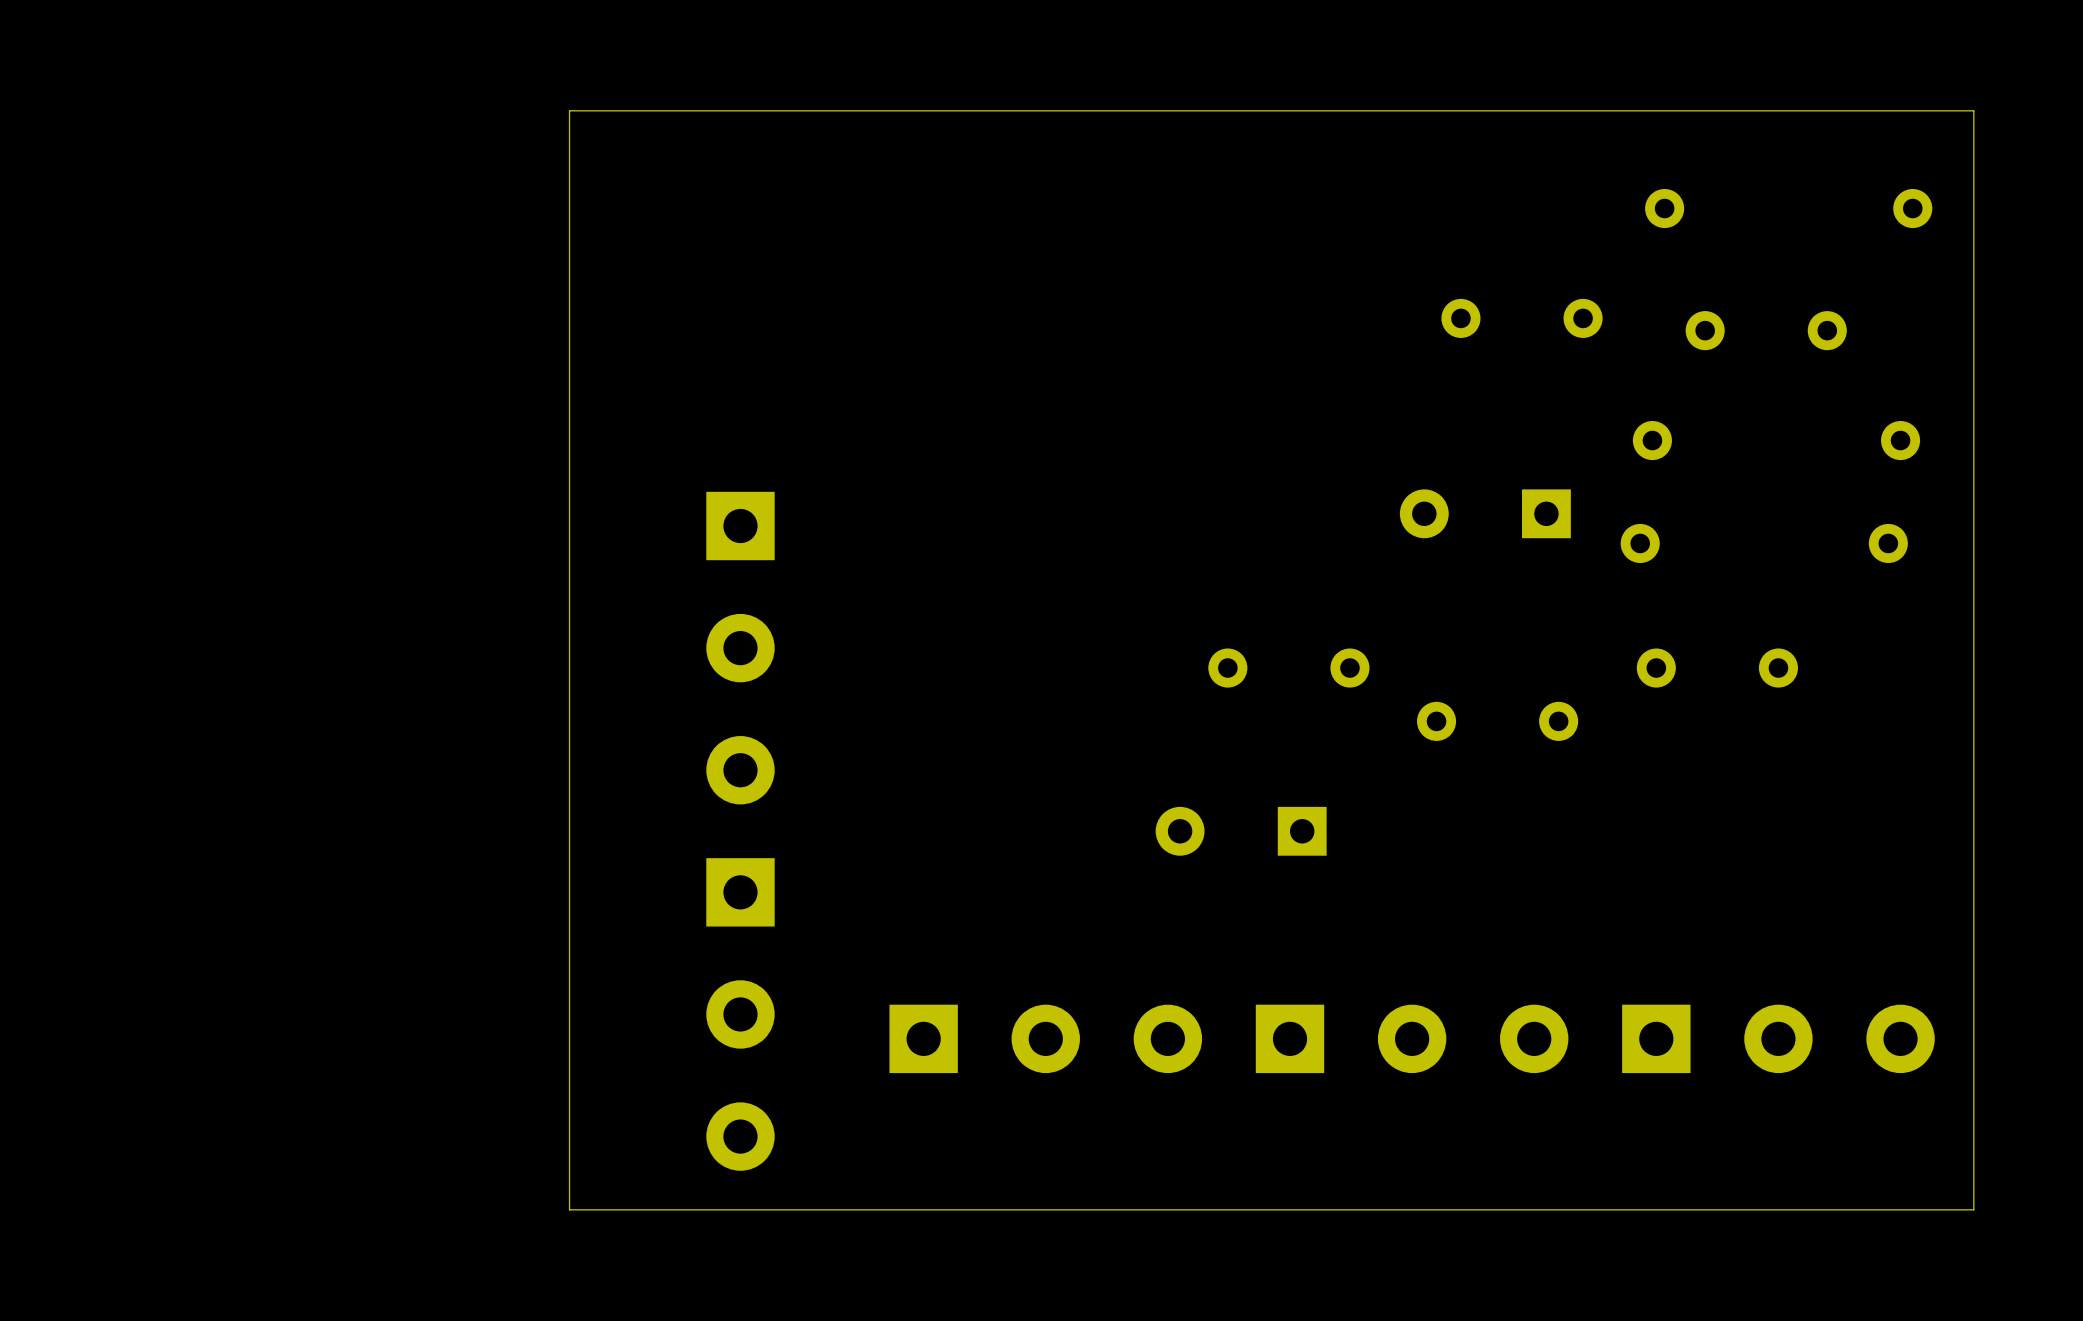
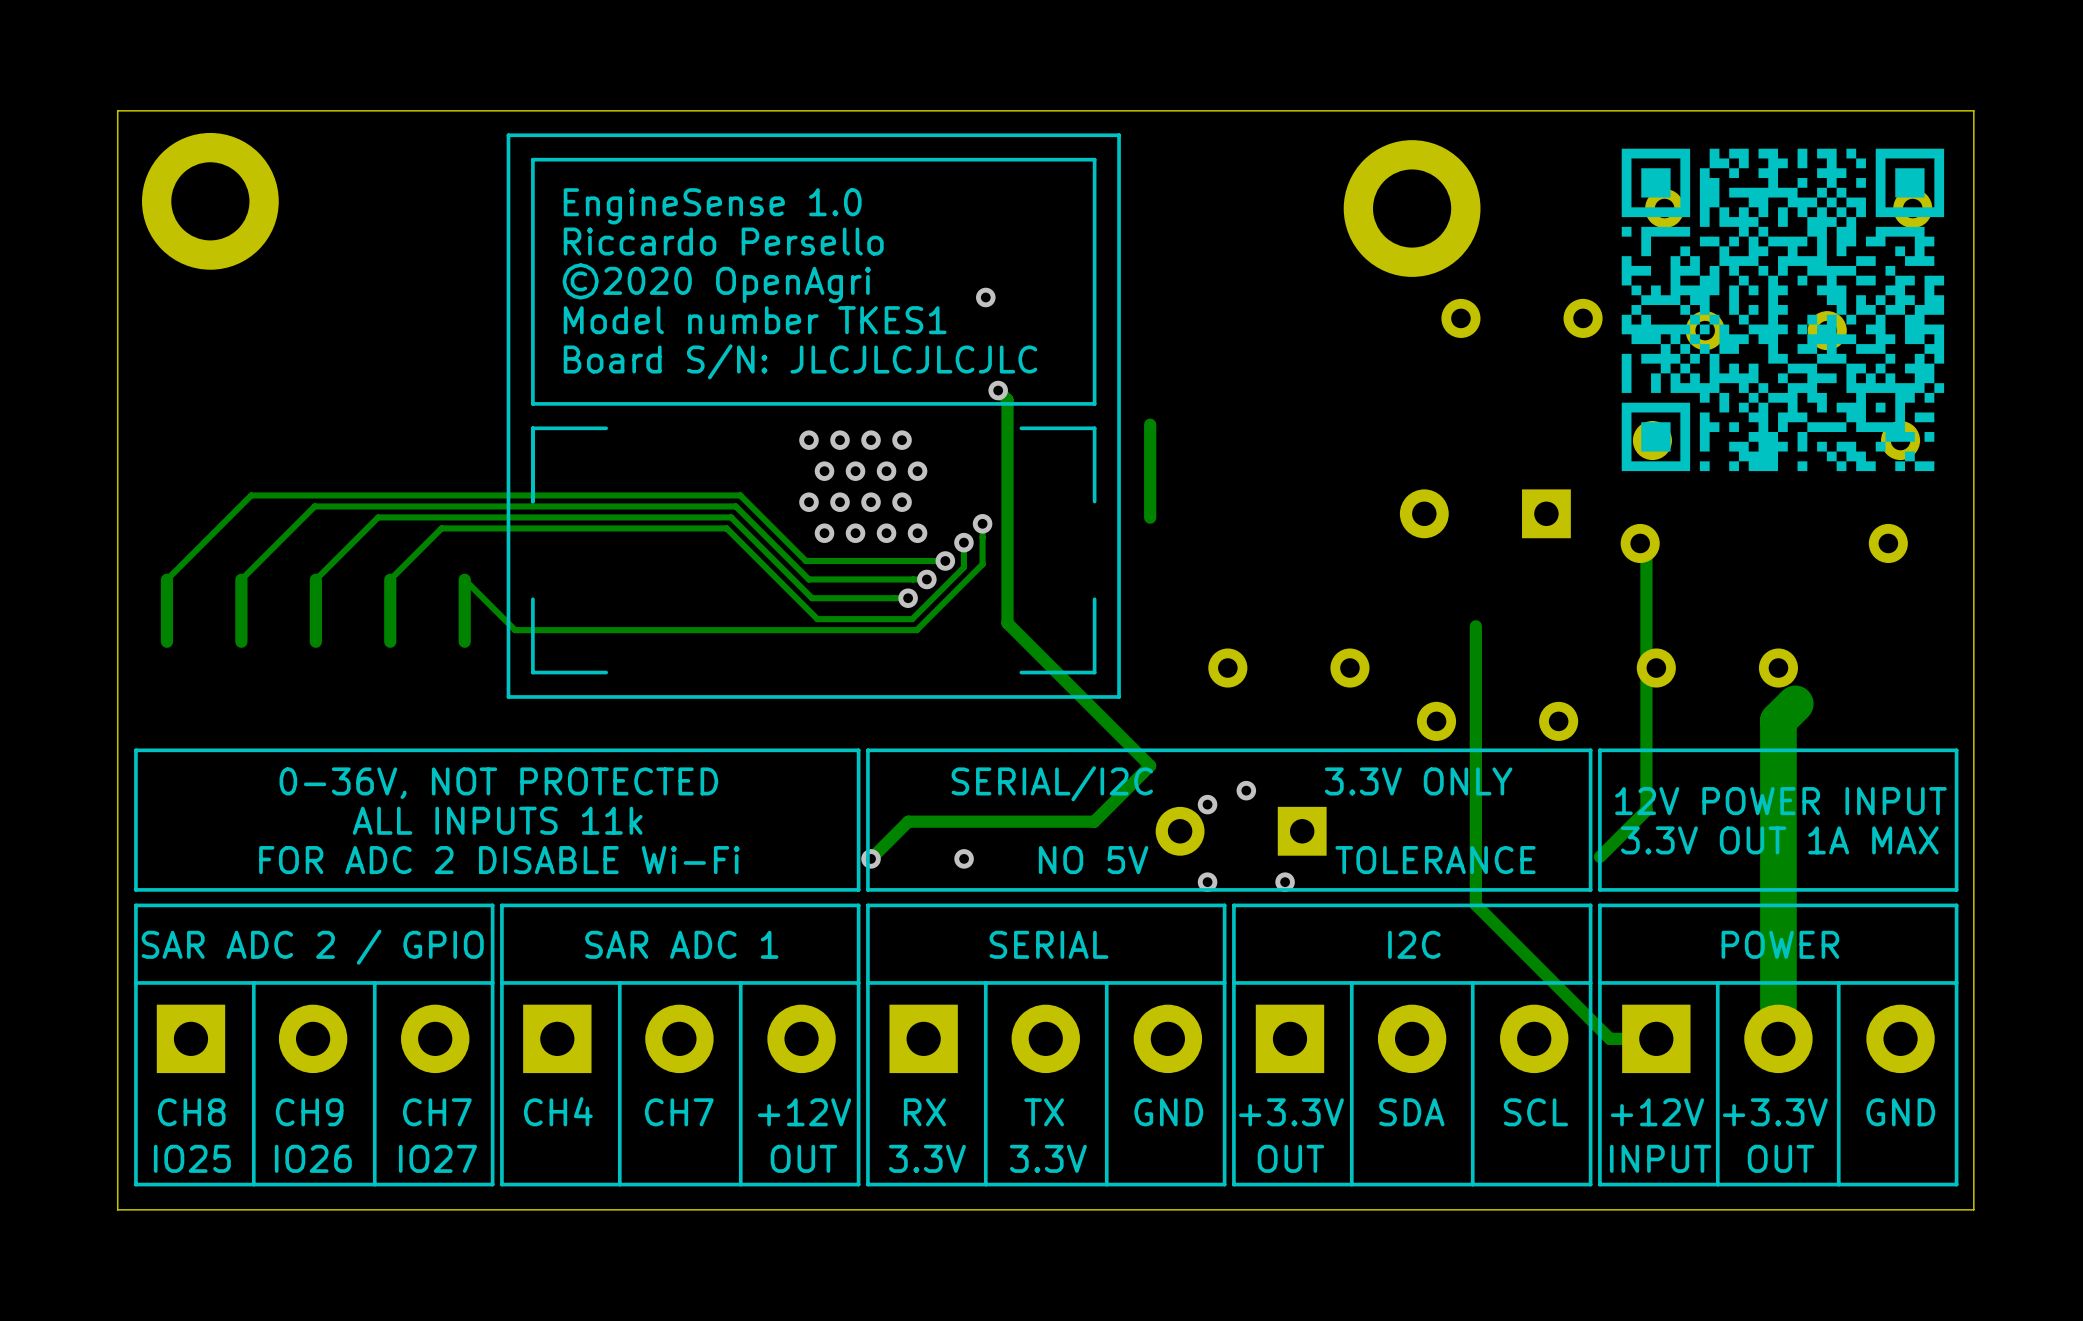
board edge: (569, 110) (569, 1209) -> (569, 110) (117, 110) (117, 1209) (569, 1209)
line: none -> (1119, 135) (1119, 696) (508, 696) (508, 135) (1119, 135)
drawing: none -> [1621, 148, 1945, 472]
line: none -> (1094, 159) (1094, 403) (532, 403) (532, 159) (1094, 159)
part: none -> (210, 201)
text: none -> EngineSense 1.0 (712, 206)
part: none -> (1412, 208)
text: none -> Riccardo Persello (723, 241)
text: none -> ©2020 OpenAgri (716, 283)
via: none -> (985, 297)
text: none -> Model number TKES1 (755, 320)
text: none -> Board S/N: JLCJLCJLCJLC (800, 361)
track: none -> (998, 390) (1007, 399) (1007, 623) (1150, 765) (1094, 821) (908, 821) (871, 858)
via: none -> (998, 390)
track: none -> (1150, 424) (1150, 517)
line: none -> (606, 428) (532, 428) (532, 501)
line: none -> (1021, 428) (1094, 428) (1094, 501)
via: none -> (809, 440)
via: none -> (840, 440)
via: none -> (871, 440)
via: none -> (902, 440)
via: none -> (824, 471)
via: none -> (855, 471)
via: none -> (886, 471)
via: none -> (917, 471)
via: none -> (809, 502)
via: none -> (840, 502)
via: none -> (871, 502)
via: none -> (902, 502)
track: none -> (982, 523) (982, 564) (916, 630) (515, 630) (464, 579) (464, 641)
via: none -> (982, 523)
via: none -> (824, 533)
via: none -> (855, 533)
via: none -> (886, 533)
via: none -> (917, 533)
track: none -> (1646, 533) (1646, 810) (1599, 856)
track: none -> (963, 542) (963, 567) (912, 619) (817, 619) (726, 528) (441, 528) (390, 579) (390, 641)
via: none -> (963, 542)
track: none -> (945, 561) (805, 561) (740, 495) (251, 495) (166, 579) (166, 641)
via: none -> (945, 561)
track: none -> (926, 579) (808, 579) (735, 506) (314, 506) (241, 579) (241, 641)
via: none -> (926, 579)
track: none -> (908, 598) (812, 598) (731, 517) (378, 517) (315, 579) (315, 641)
via: none -> (908, 598)
line: none -> (532, 599) (532, 672) (606, 672)
line: none -> (1094, 599) (1094, 672) (1021, 672)
track: none -> (1475, 626) (1475, 904) (1609, 1038) (1656, 1038)
part: (740, 648) -> none
track: none -> (1795, 703) (1778, 720) (1778, 1038)
line: none -> (858, 750) (135, 750) (135, 889) (858, 889) (858, 750)
line: none -> (1590, 750) (867, 750) (867, 889) (1590, 889) (1590, 750)
line: none -> (1956, 750) (1599, 750) (1599, 889) (1956, 889) (1956, 750)
text: none -> 0-36V, NOT PROTECTED (498, 783)
text: none -> SERIAL/I2C 3.3V ONLY (1231, 783)
via: none -> (1246, 790)
text: none -> 12V POWER INPUT (1780, 801)
via: none -> (1207, 804)
text: none -> ALL INPUTS 11k (497, 820)
text: none -> 3.3V OUT 1A MAX (1779, 840)
via: none -> (871, 858)
via: none -> (964, 858)
text: none -> FOR ADC 2 DISABLE Wi-Fi (499, 860)
text: none -> NO 5V TOLERANCE (1287, 860)
via: none -> (1207, 882)
via: none -> (1285, 882)
line: none -> (492, 905) (492, 1184) (135, 1184) (135, 905) (492, 905)
line: none -> (858, 905) (858, 1184) (501, 1184) (501, 905) (858, 905)
line: none -> (1224, 905) (867, 905) (867, 1184) (1224, 1184) (1224, 905)
line: none -> (1590, 905) (1590, 1184) (1233, 1184) (1233, 905) (1590, 905)
line: none -> (1956, 905) (1956, 1184) (1599, 1184) (1599, 905) (1956, 905)
text: none -> SAR ADC 1 (681, 944)
text: none -> SERIAL (1048, 944)
text: none -> I2C (1414, 944)
text: none -> POWER (1780, 944)
text: none -> SAR ADC 2 / GPIO (312, 947)
line: none -> (253, 982) (253, 1184)
line: none -> (374, 982) (374, 1184)
line: none -> (492, 982) (135, 982)
line: none -> (619, 982) (619, 1184)
line: none -> (740, 982) (740, 1184)
line: none -> (858, 982) (501, 982)
line: none -> (985, 982) (985, 1184)
line: none -> (1106, 982) (1106, 1184)
line: none -> (1224, 982) (867, 982)
line: none -> (1351, 982) (1351, 1184)
line: none -> (1472, 982) (1472, 1184)
line: none -> (1590, 982) (1233, 982)
line: none -> (1717, 982) (1717, 1184)
line: none -> (1838, 982) (1838, 1184)
line: none -> (1956, 982) (1599, 982)
part rotation: 0° (740, 1014) -> 90° counterclockwise (679, 1038)
part: none -> (313, 1038)
text: none -> CH4 (558, 1111)
text: none -> CH8 (191, 1112)
text: none -> CH9 (309, 1112)
text: none -> CH7 (437, 1112)
text: none -> CH7 (679, 1112)
text: none -> +12V (804, 1112)
text: none -> RX (924, 1112)
text: none -> TX (1044, 1112)
text: none -> GND (1168, 1112)
text: none -> +3.3V (1291, 1112)
text: none -> SDA (1411, 1112)
text: none -> SCL (1535, 1112)
text: none -> +12V (1657, 1112)
text: none -> +3.3V (1775, 1112)
text: none -> GND (1900, 1112)
text: none -> IO25 (192, 1158)
text: none -> IO26 (313, 1158)
text: none -> IO27 (437, 1158)
text: none -> OUT (803, 1158)
text: none -> 3.3V (927, 1158)
text: none -> 3.3V (1048, 1158)
text: none -> OUT (1290, 1158)
text: none -> INPUT (1660, 1158)
text: none -> OUT (1780, 1158)

